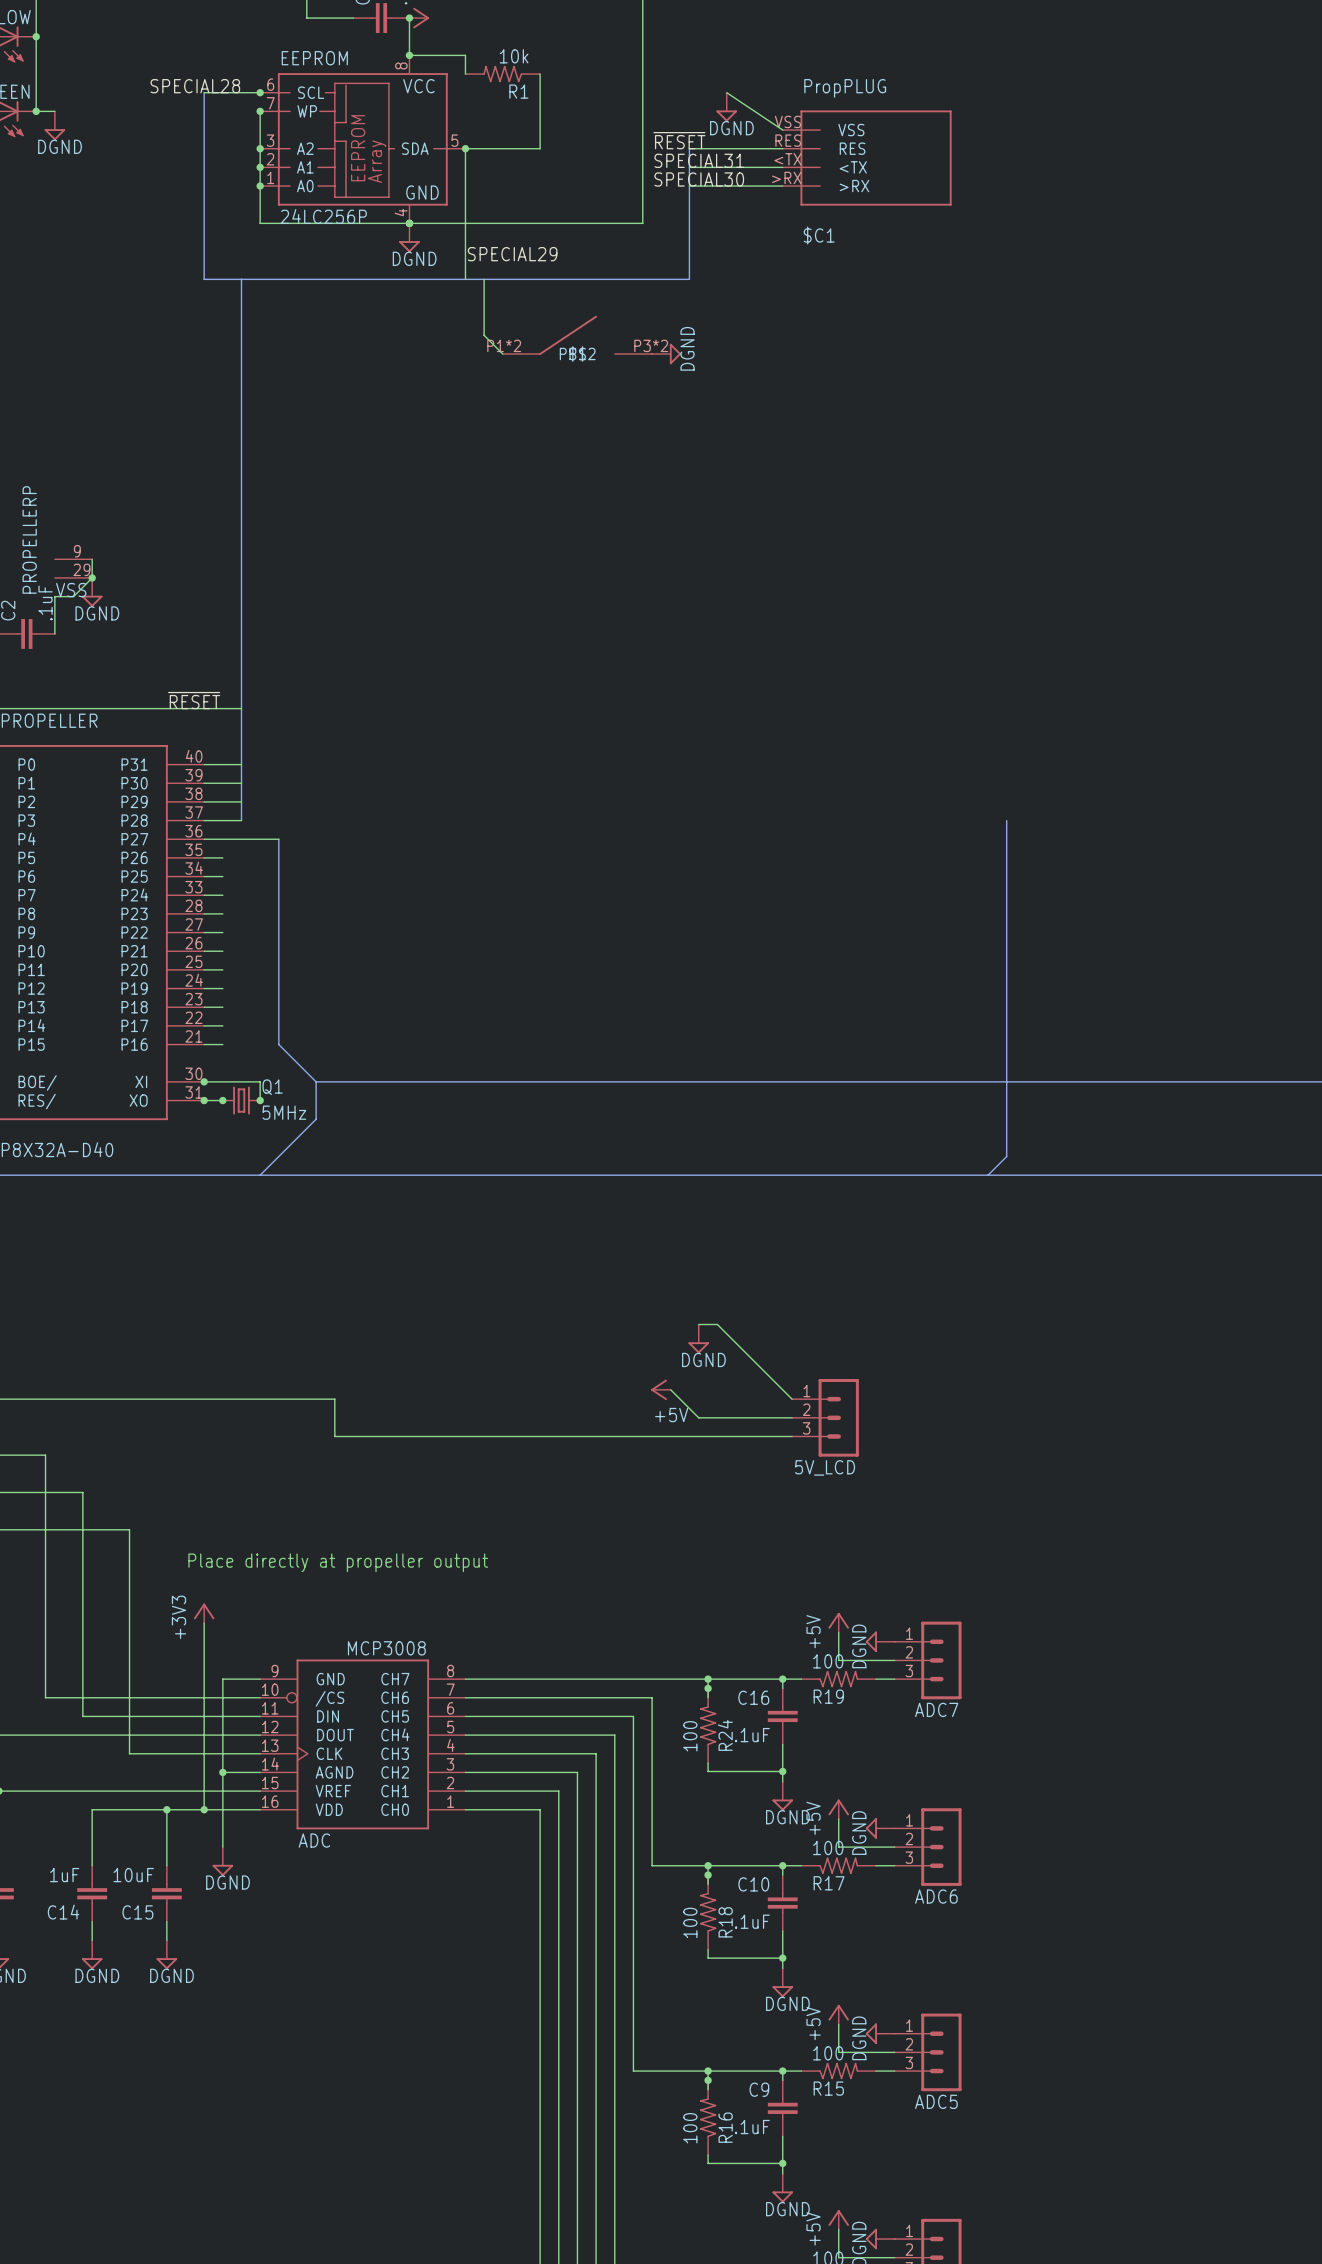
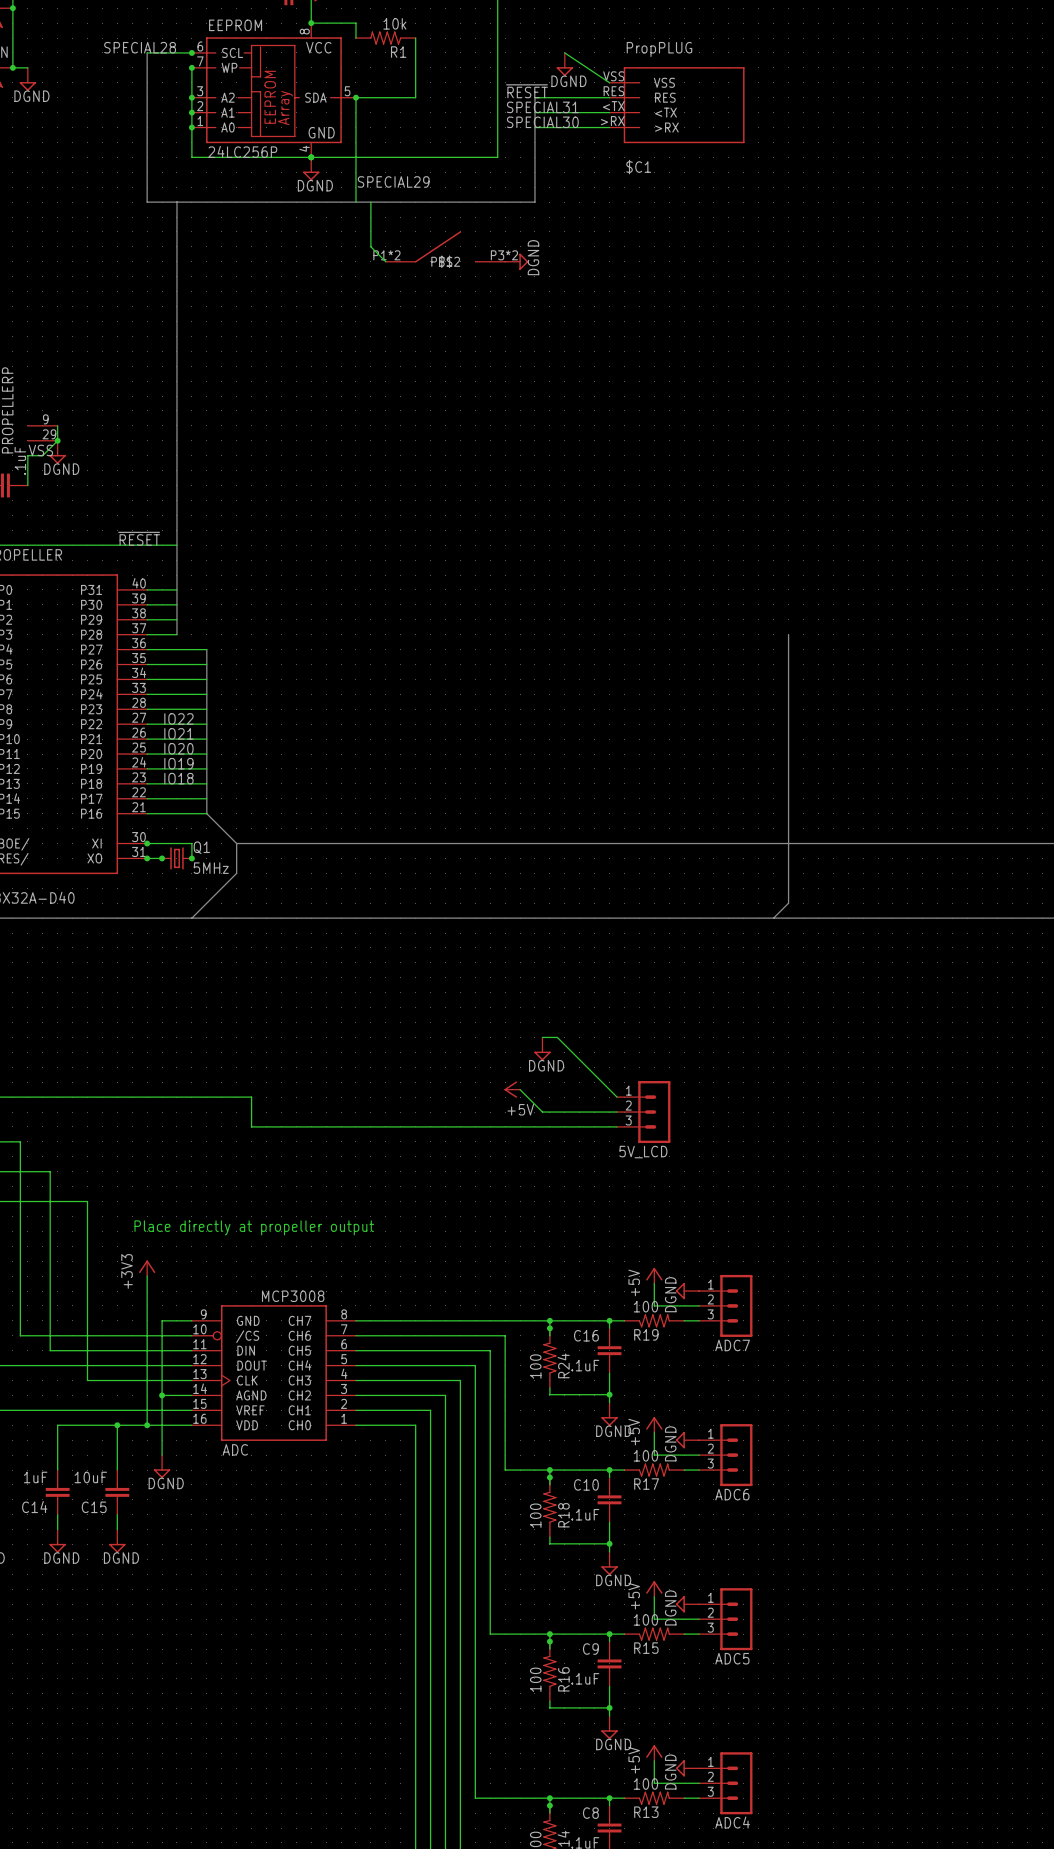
wire: none -> (162, 664) (206, 664)
wire: none -> (162, 679) (206, 679)
wire: none -> (162, 694) (206, 694)
wire: none -> (162, 709) (206, 709)
label: none -> IO22 (178, 718)
wire: none -> (162, 724) (206, 724)
label: none -> IO21 (178, 733)
wire: none -> (162, 739) (206, 739)
label: none -> IO20 (178, 748)
wire: none -> (162, 754) (206, 754)
label: none -> IO19 (178, 763)
wire: none -> (162, 768) (206, 768)
label: none -> IO18 (178, 778)
wire: none -> (162, 783) (206, 783)
wire: none -> (162, 798) (206, 798)
wire: none -> (162, 813) (206, 813)

